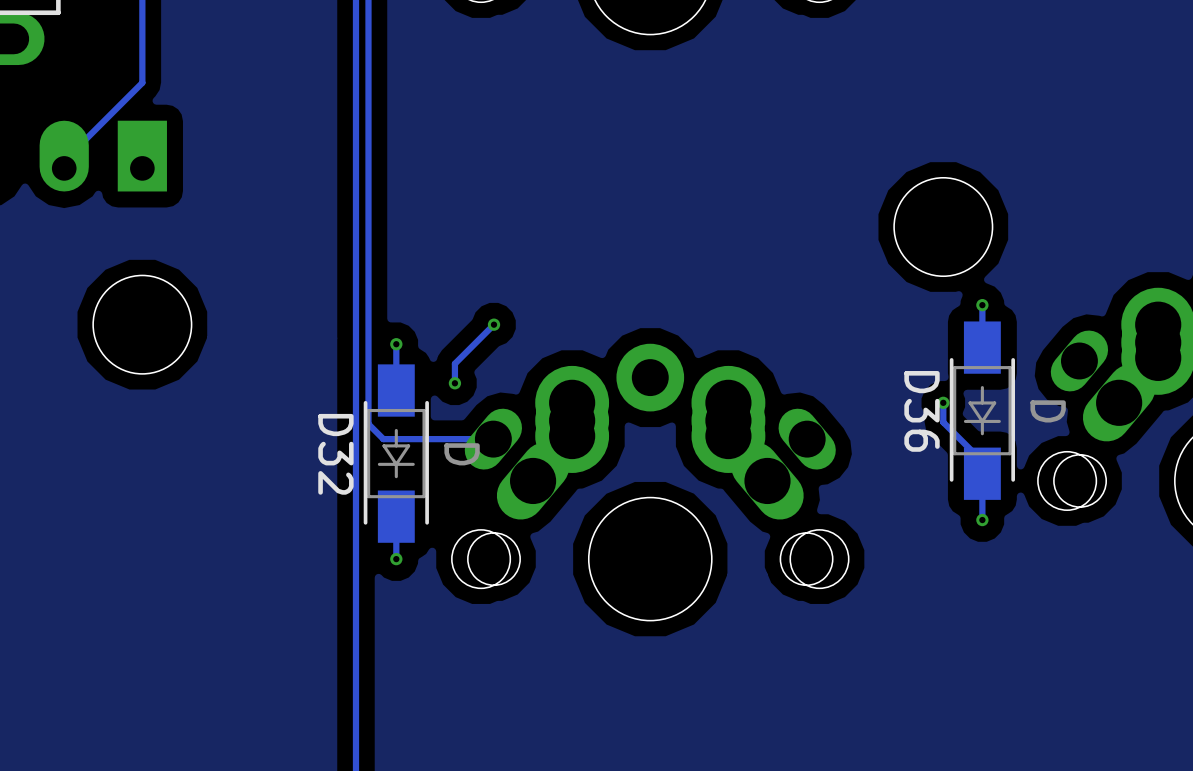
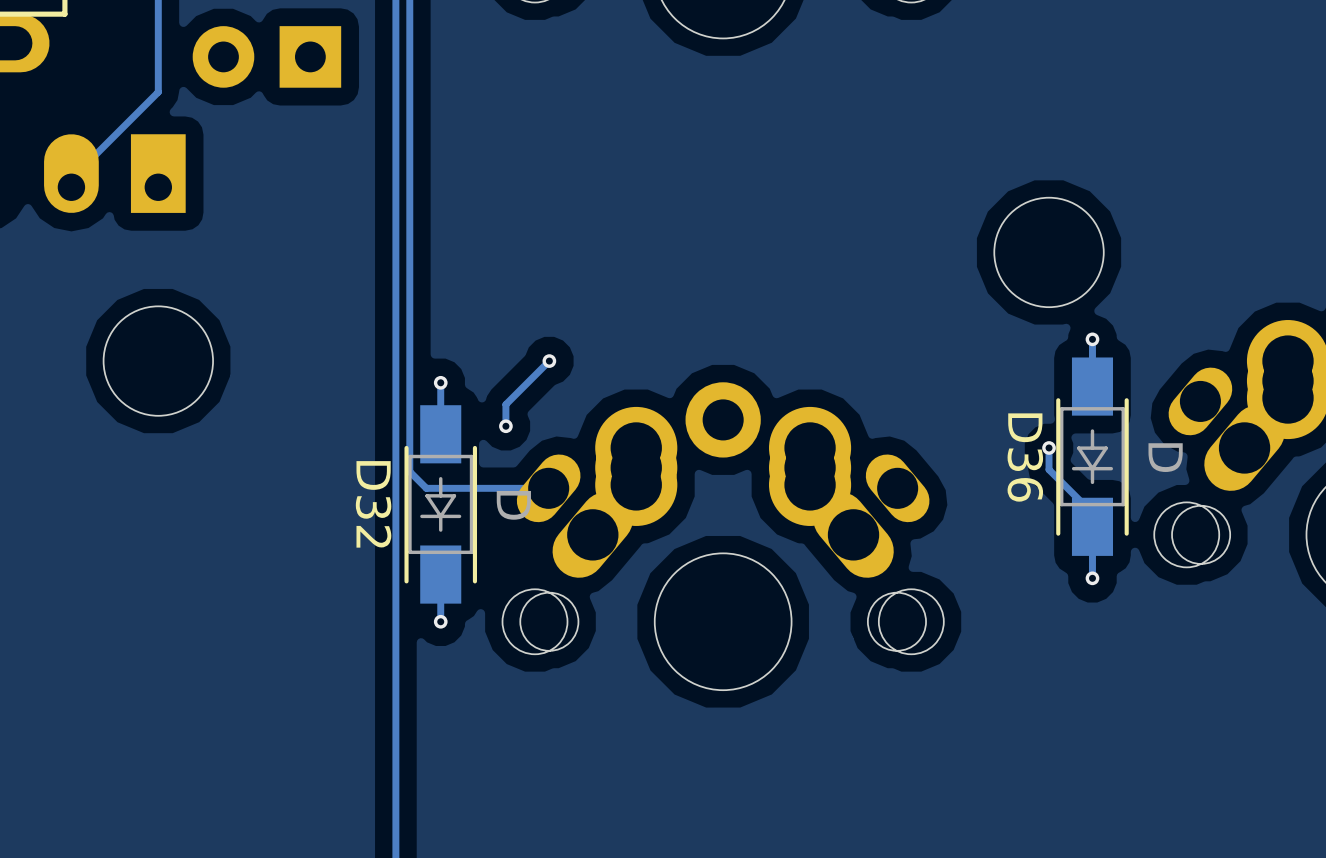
part: none -> (266, 56)

